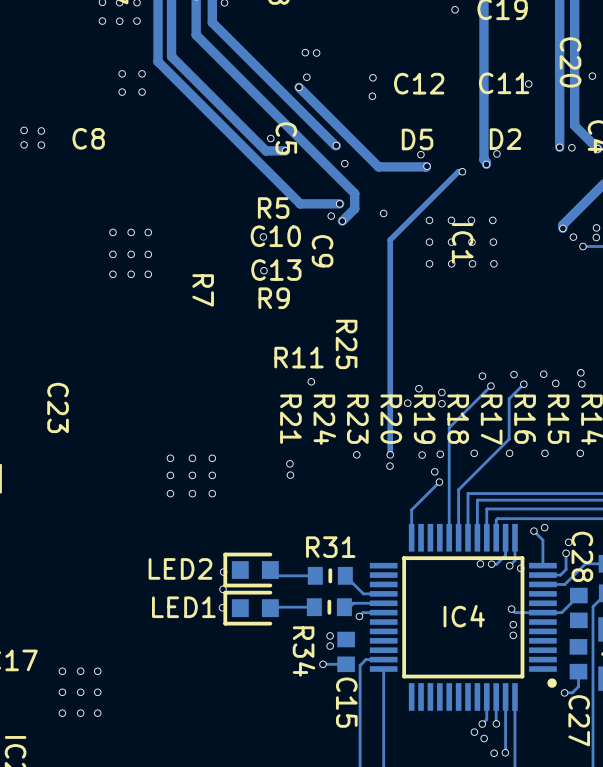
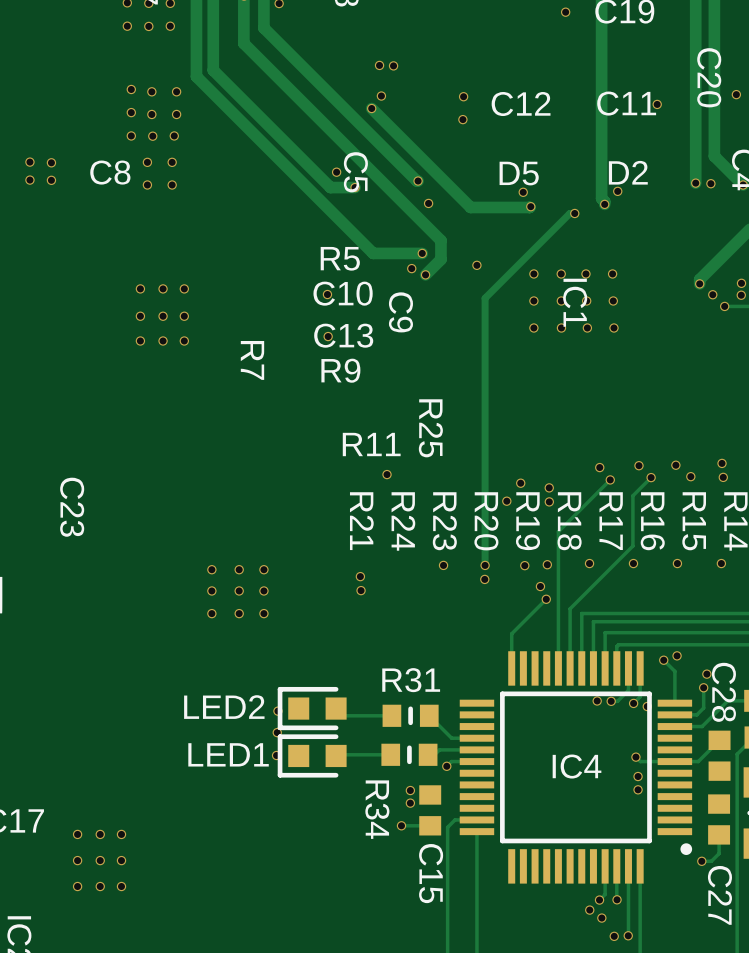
via: none -> (131, 89)
via: none -> (131, 112)
via: none -> (131, 135)
via: none -> (152, 136)
via: none -> (174, 135)
via: none -> (147, 162)
via: none -> (172, 162)
via: none -> (147, 184)
via: none -> (172, 184)

